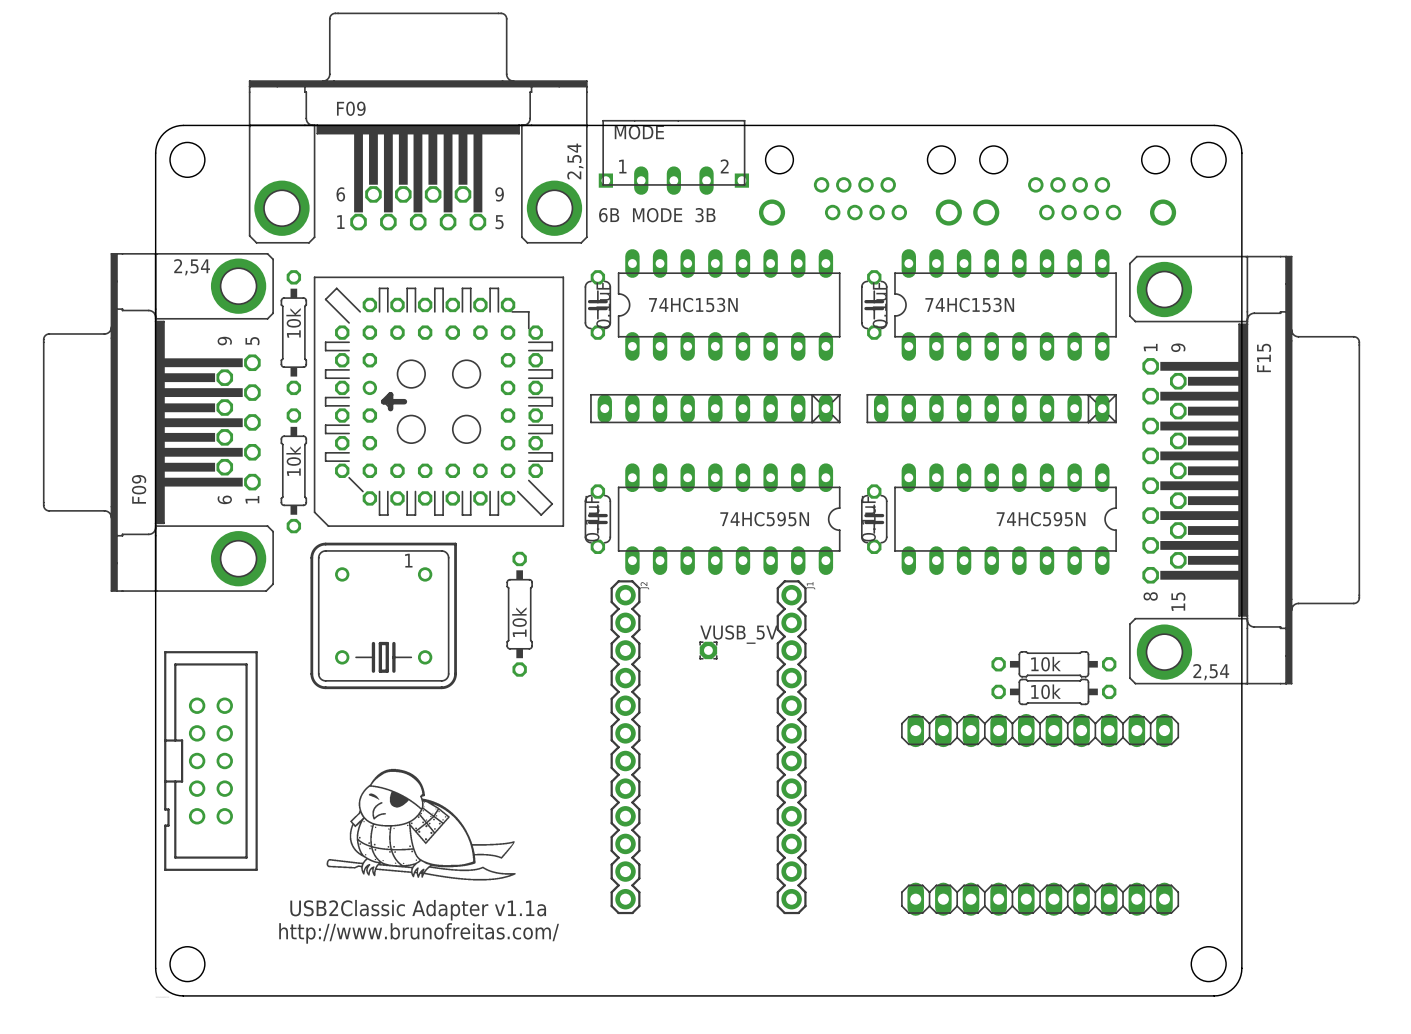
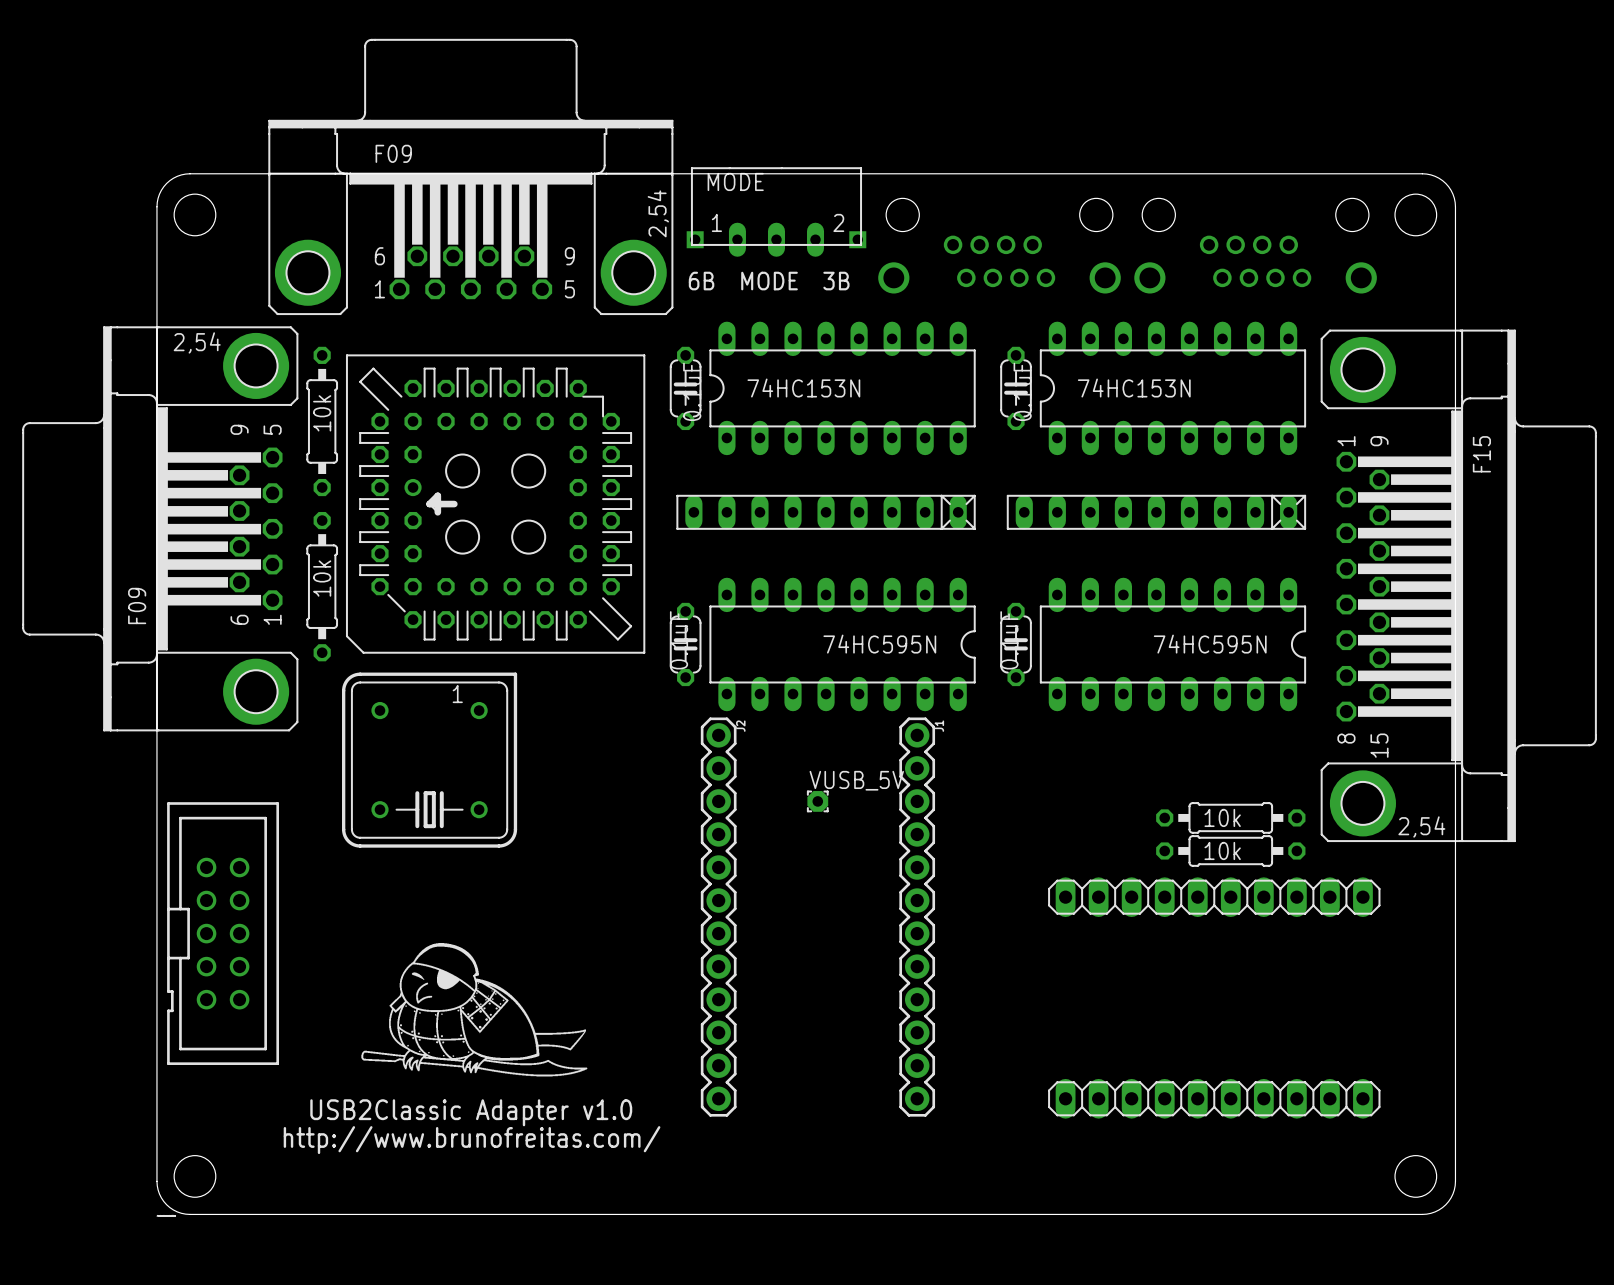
part: 10k (519, 614) -> none
text: USB2Classic Adapter v1.1a (418, 910) -> USB2Classic Adapter v1.0 (471, 1112)

